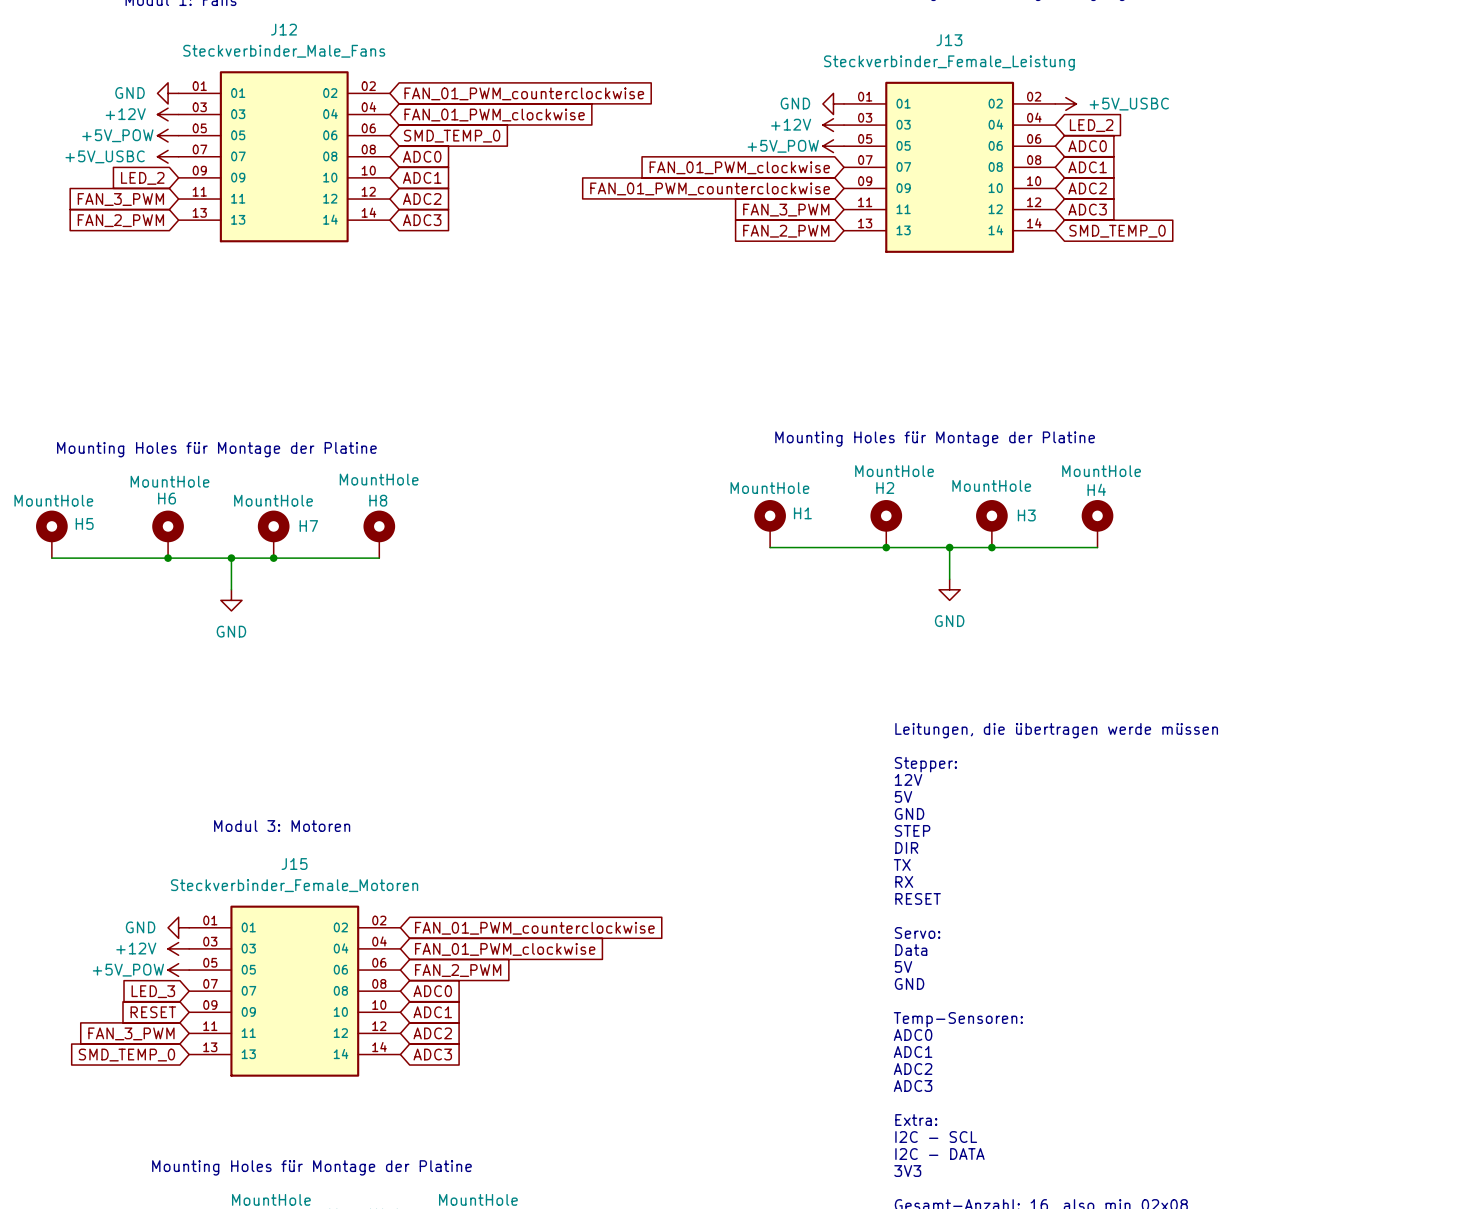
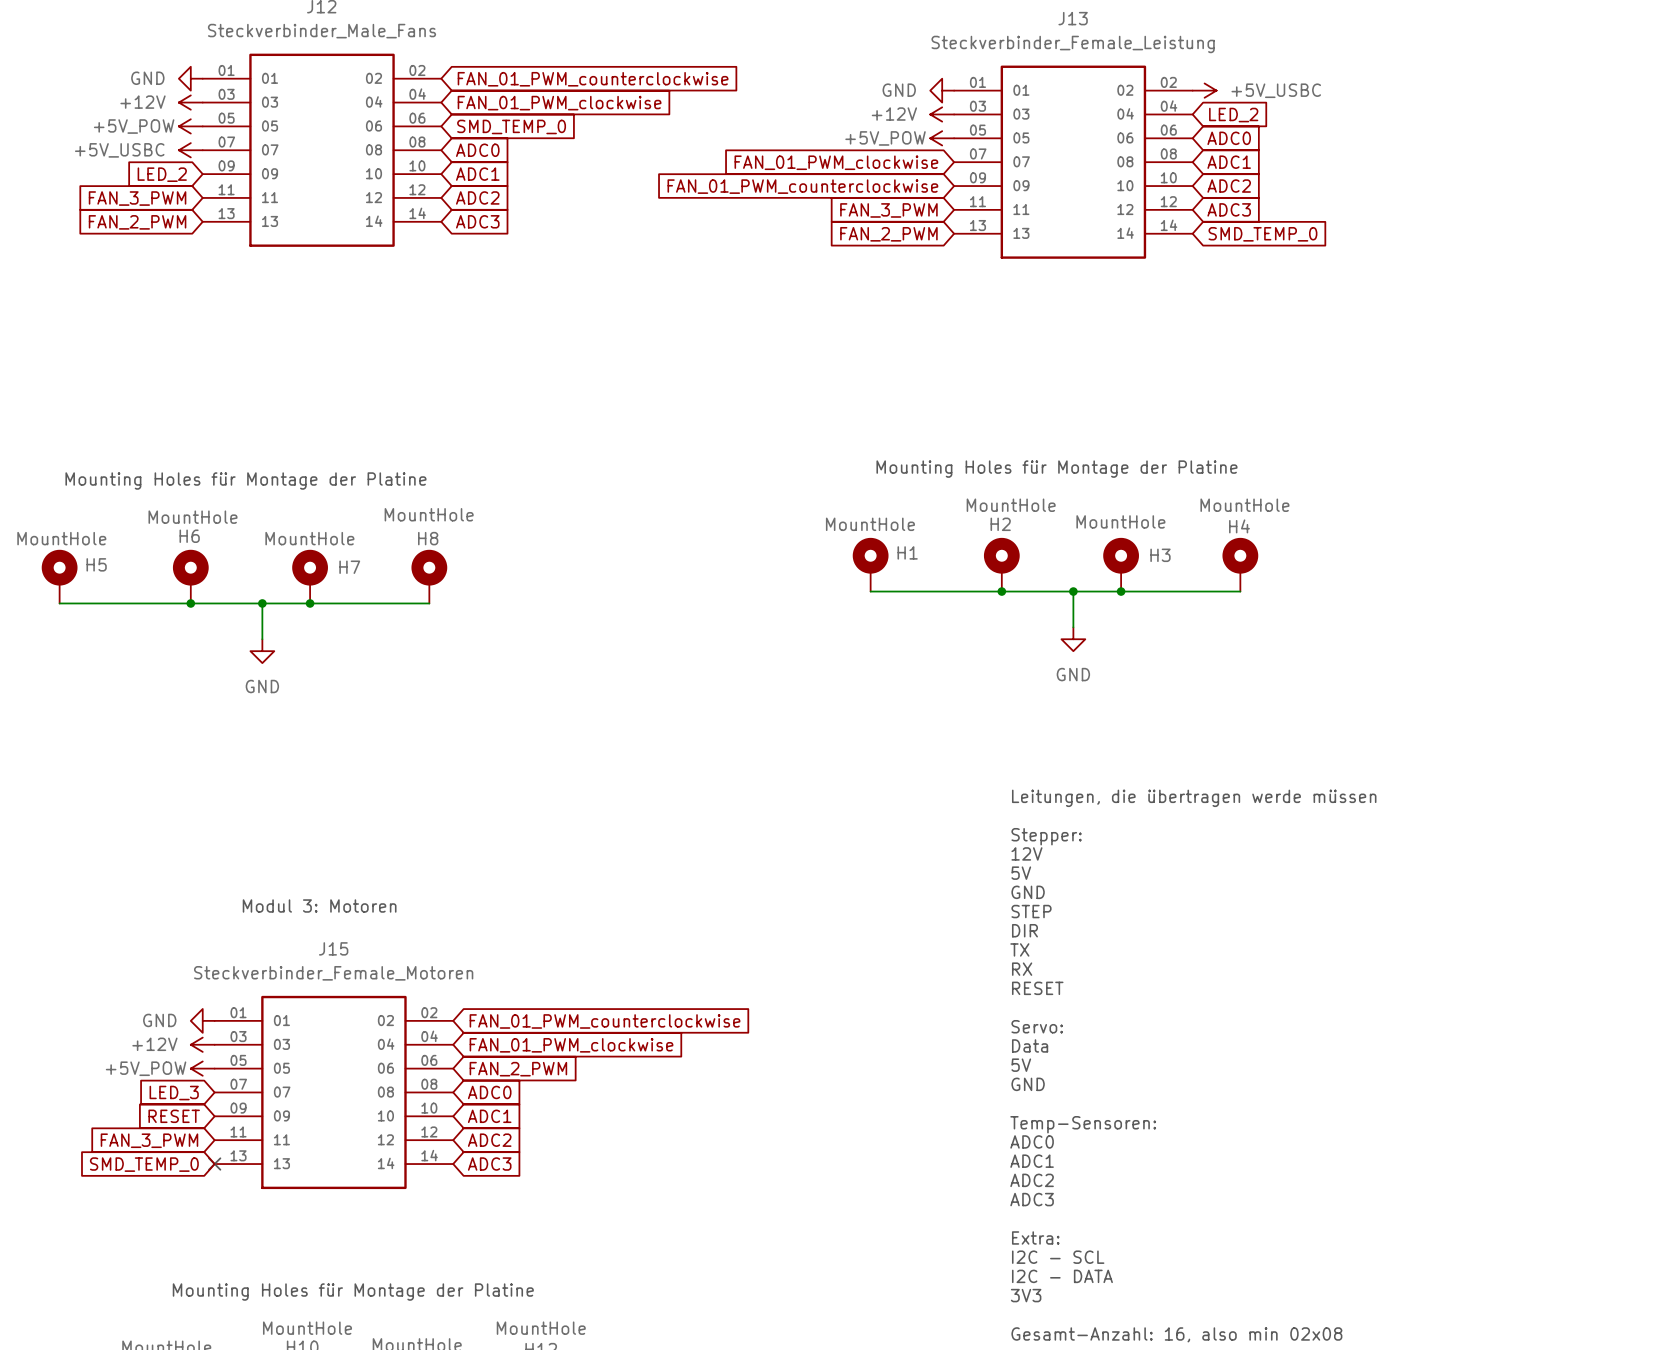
no-connect mark: none -> (214, 1164)

